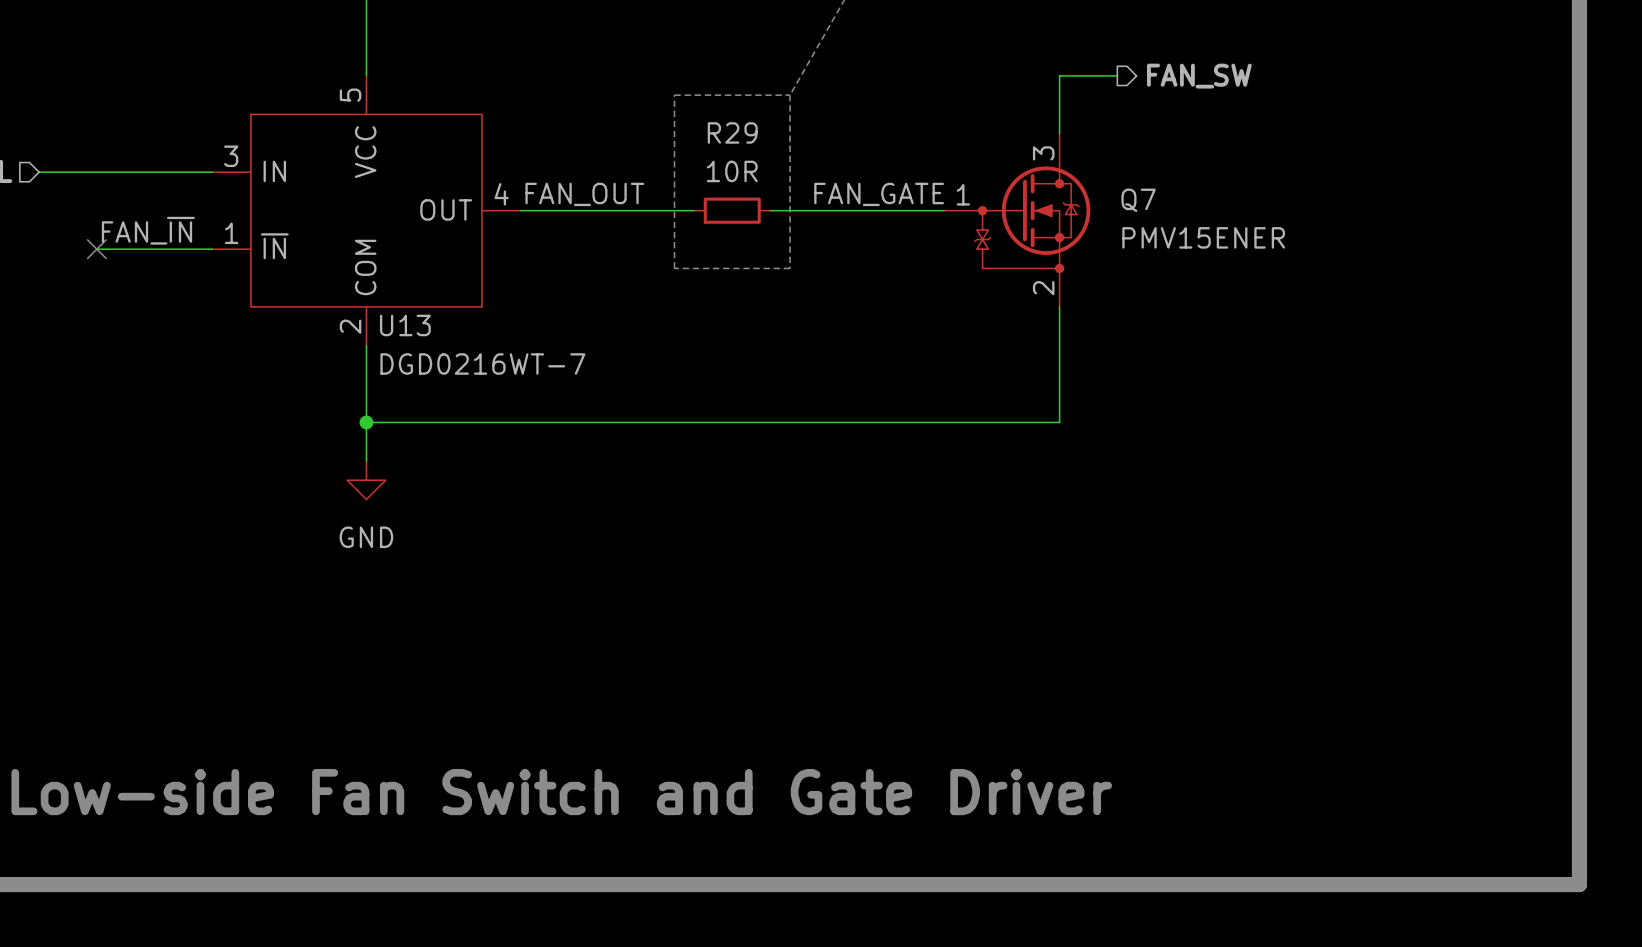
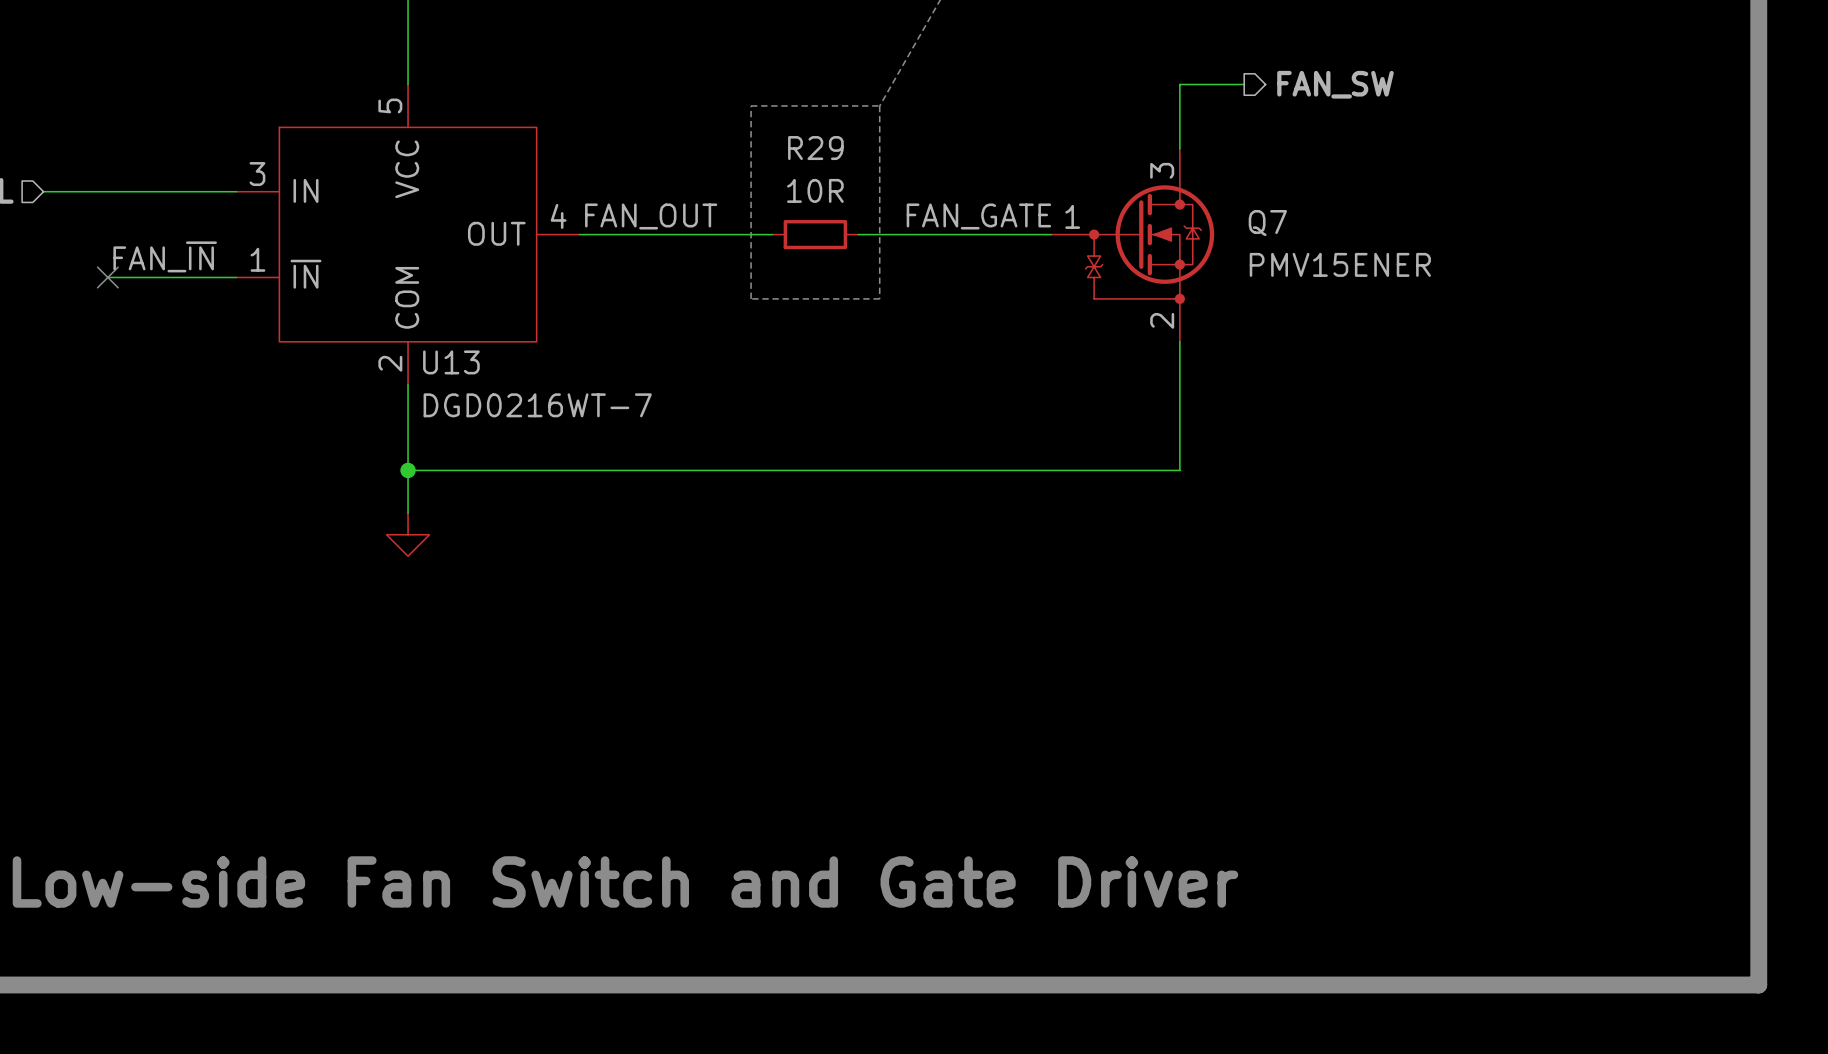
power symbol text: GND (366, 537) -> none

